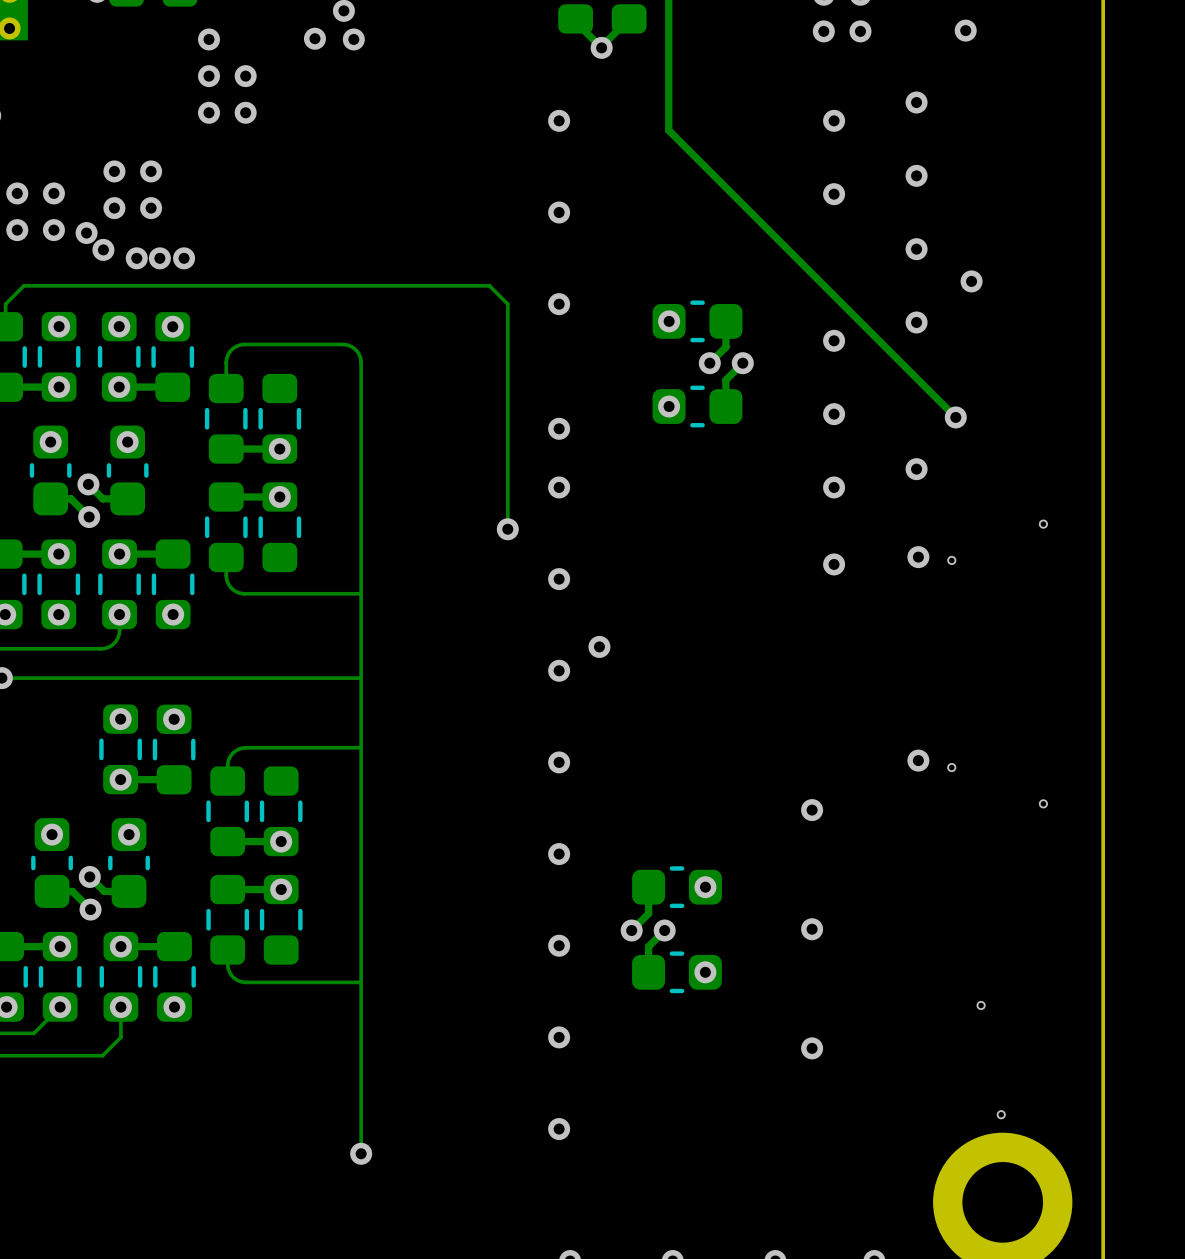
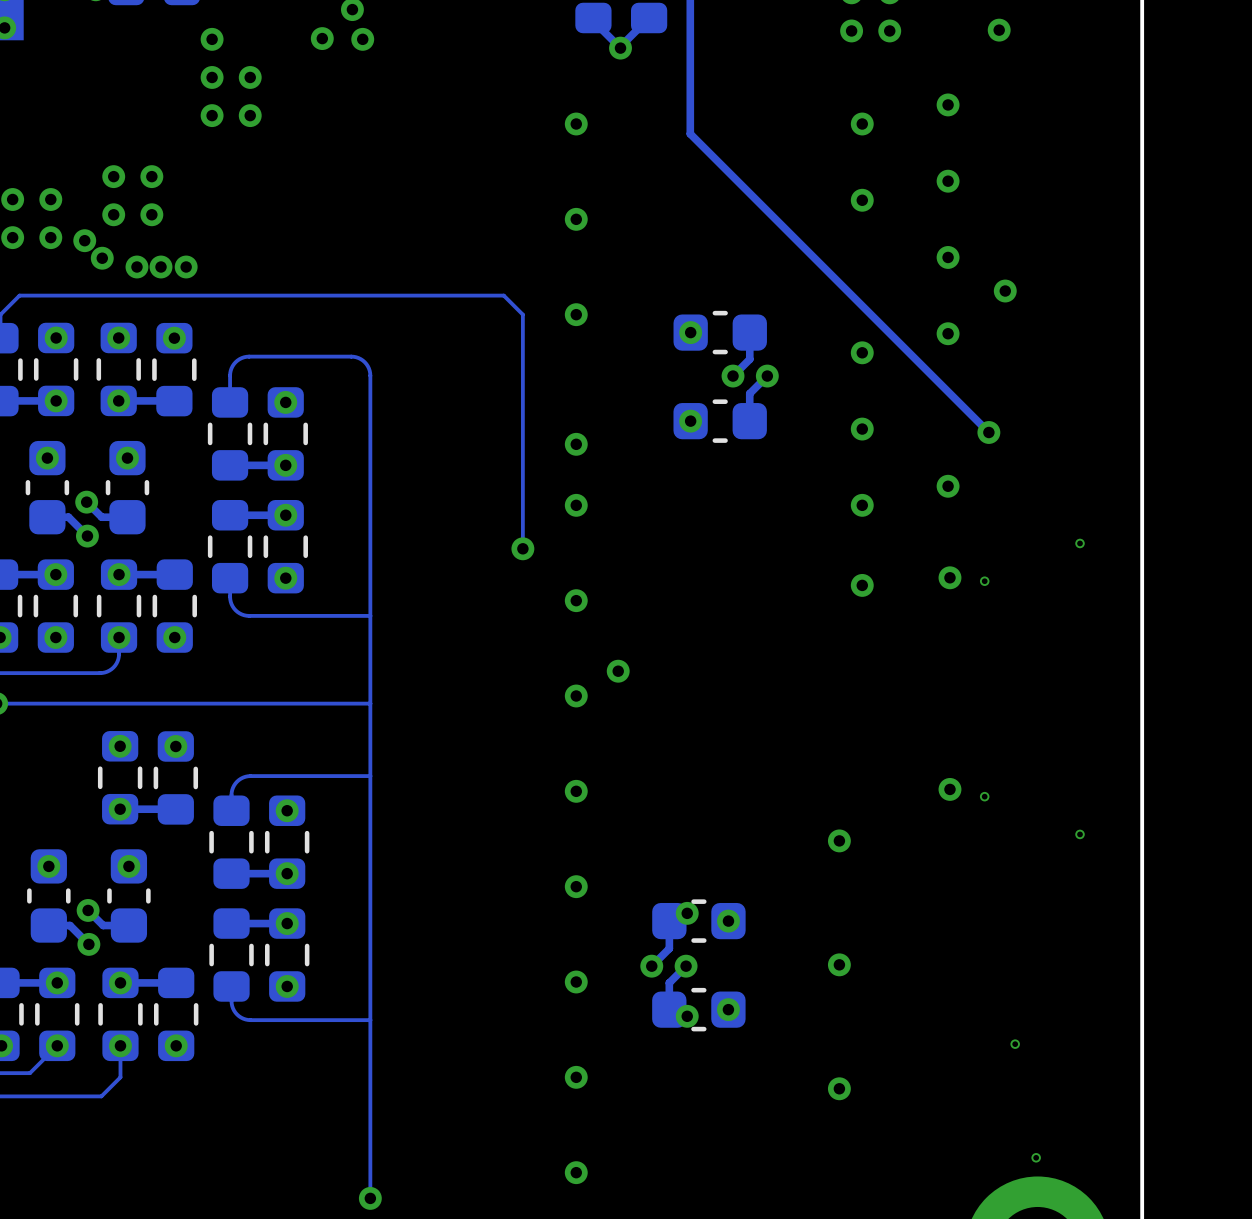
via: none -> (285, 402)
via: none -> (285, 578)
via: none -> (287, 810)
via: none -> (687, 913)
via: none -> (287, 986)
via: none -> (687, 1016)

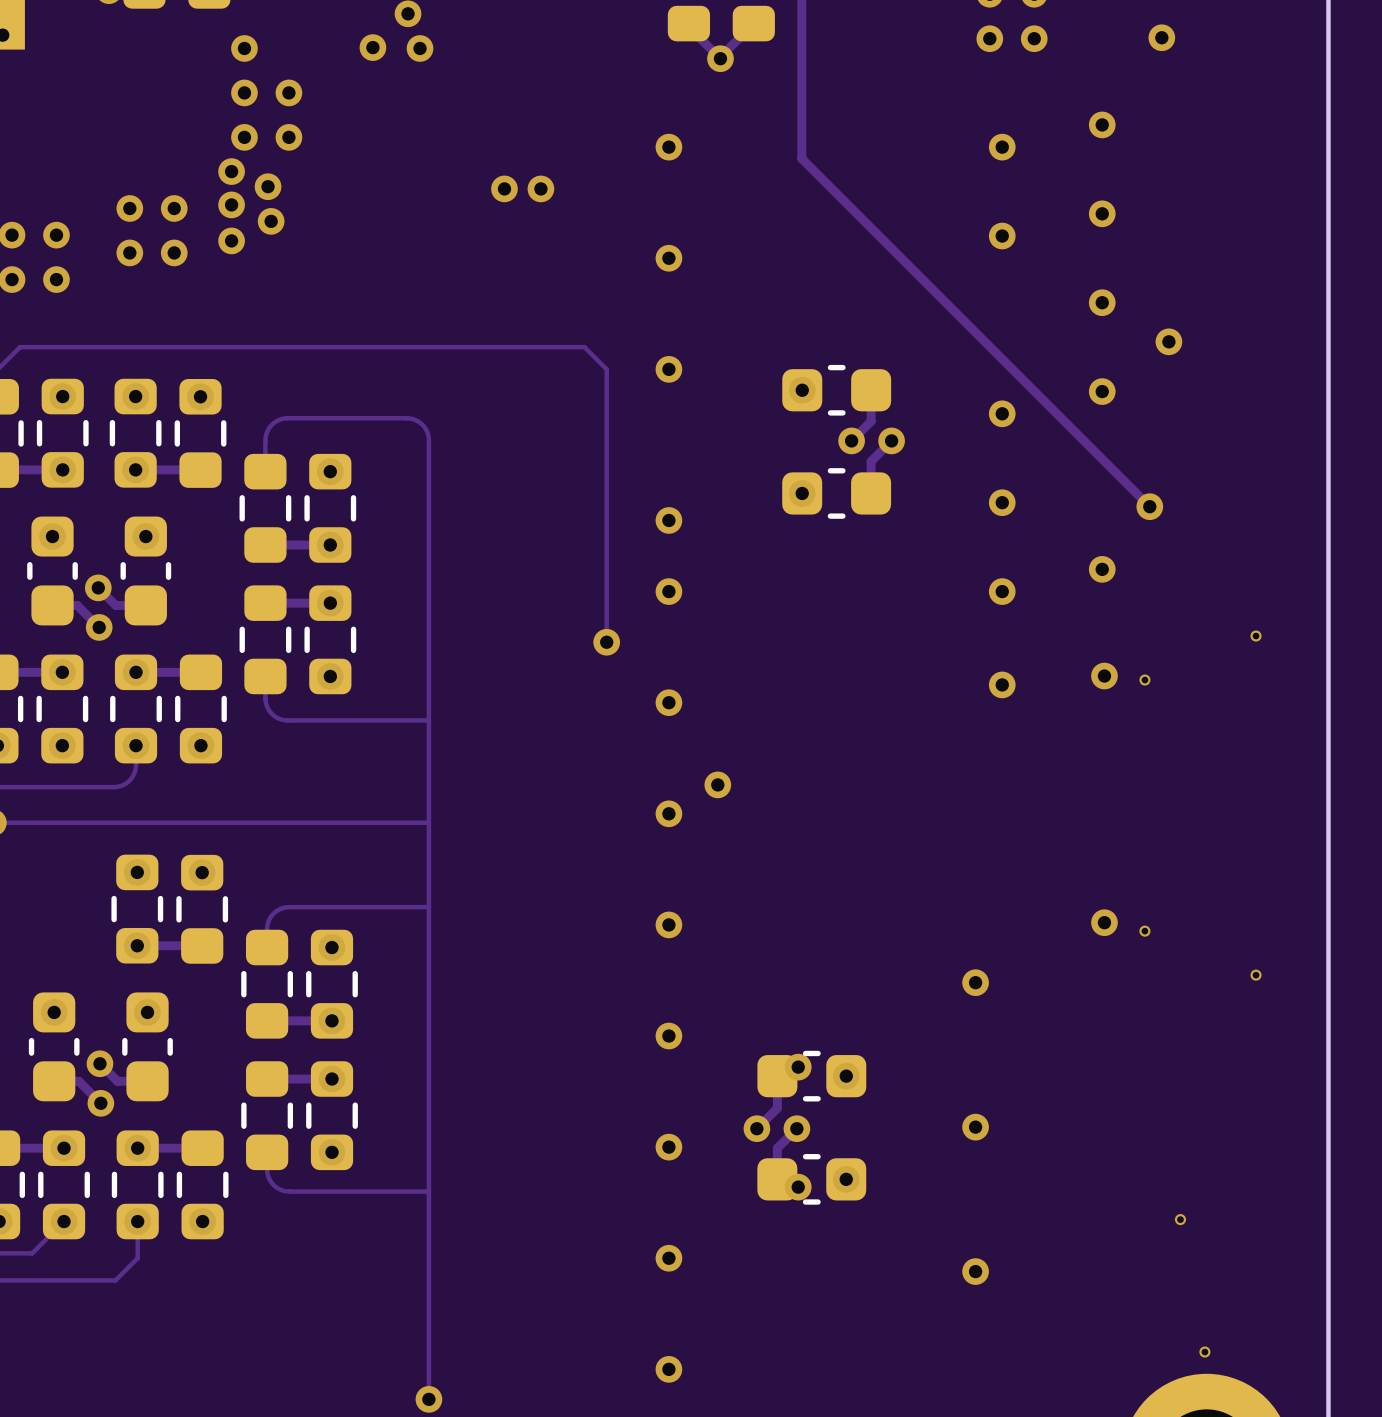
via: none -> (231, 171)
via: none -> (268, 186)
via: none -> (504, 188)
via: none -> (540, 188)
via: none -> (231, 204)
via: none -> (271, 221)
via: none -> (231, 240)
via: (84, 240) -> none
via: (102, 258) -> none
via: (136, 266) -> none
via: (161, 266) -> none
via: (186, 266) -> none

